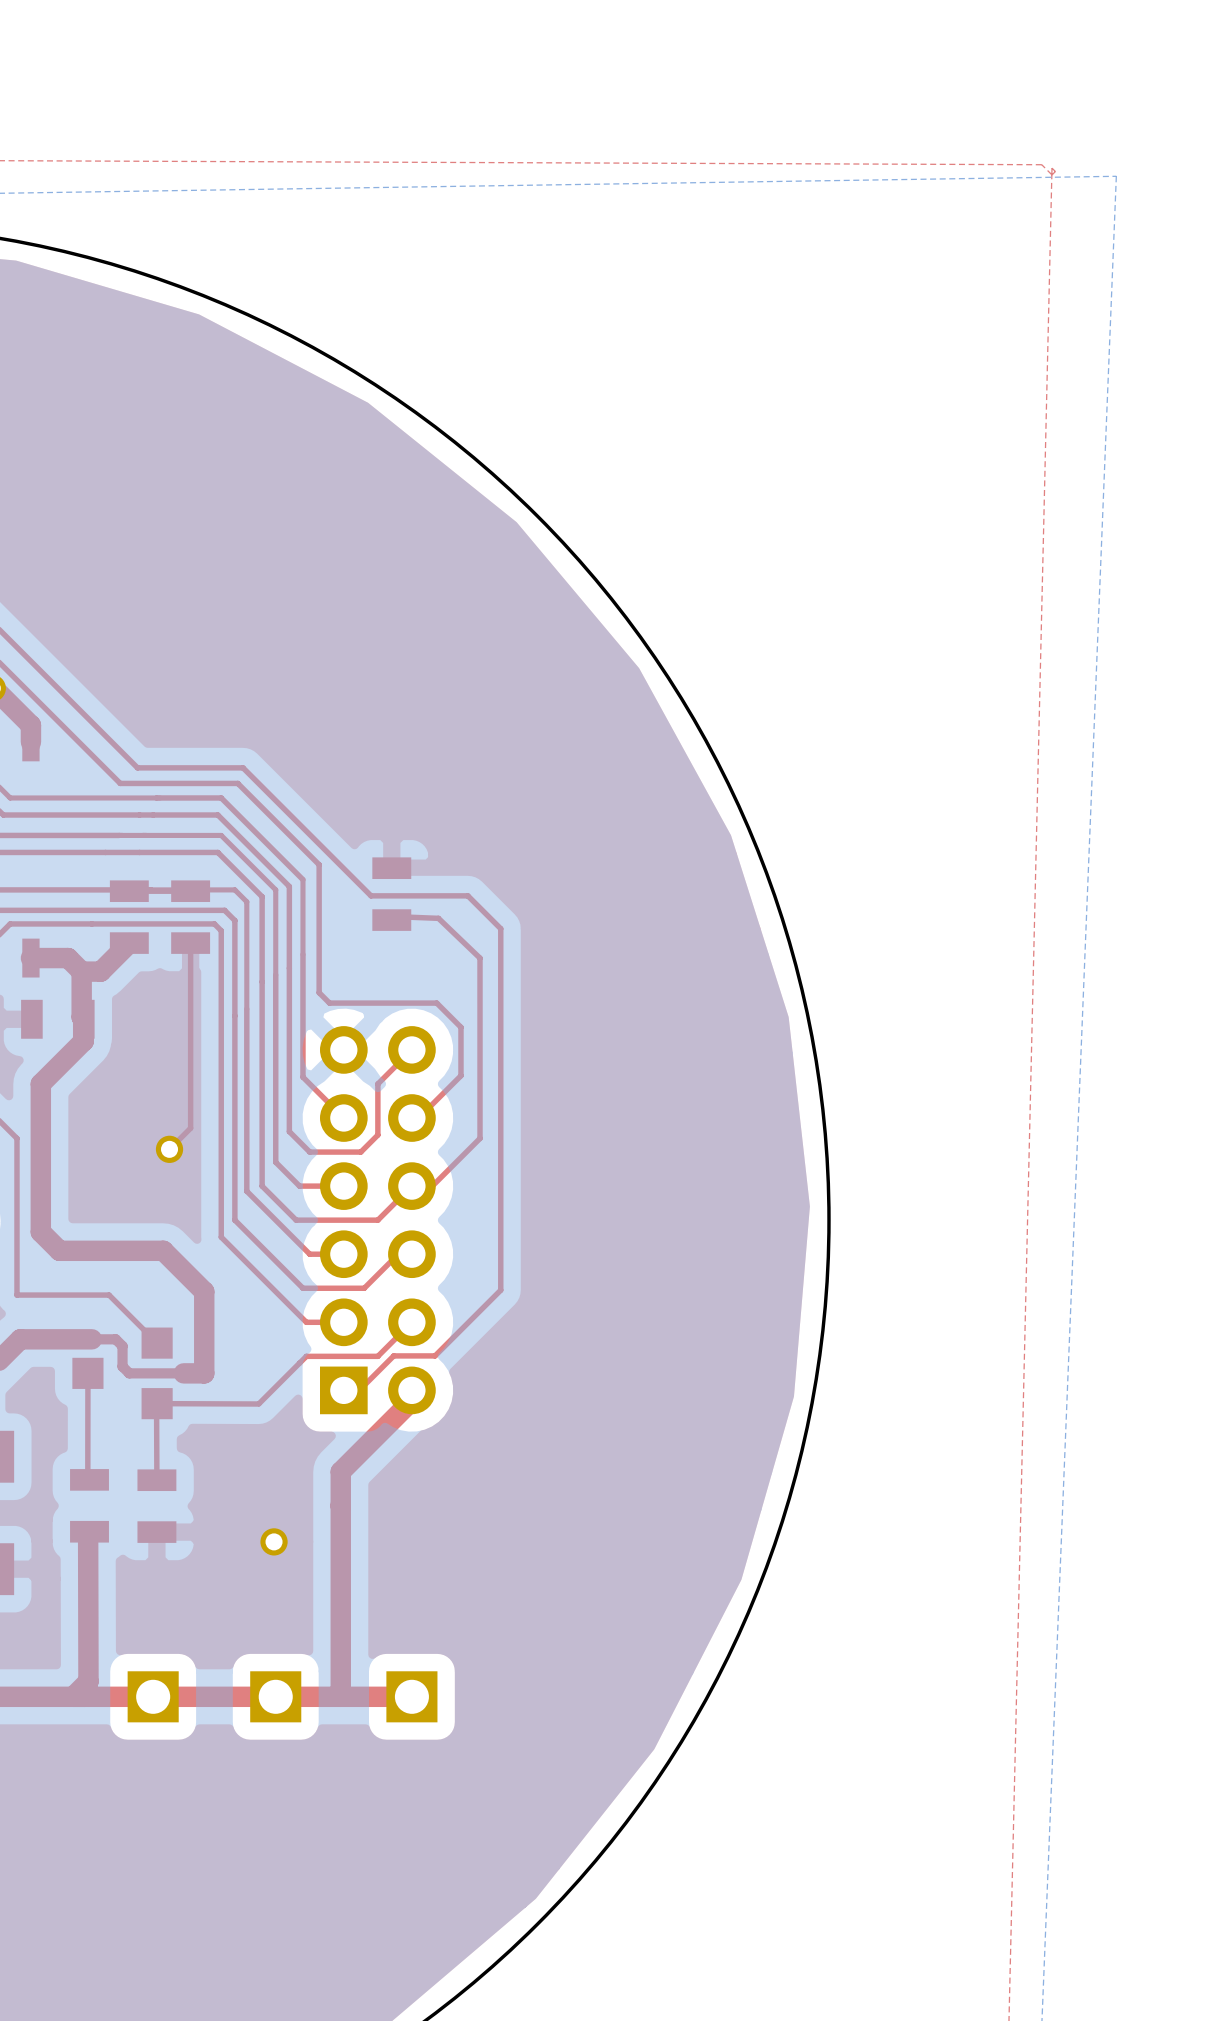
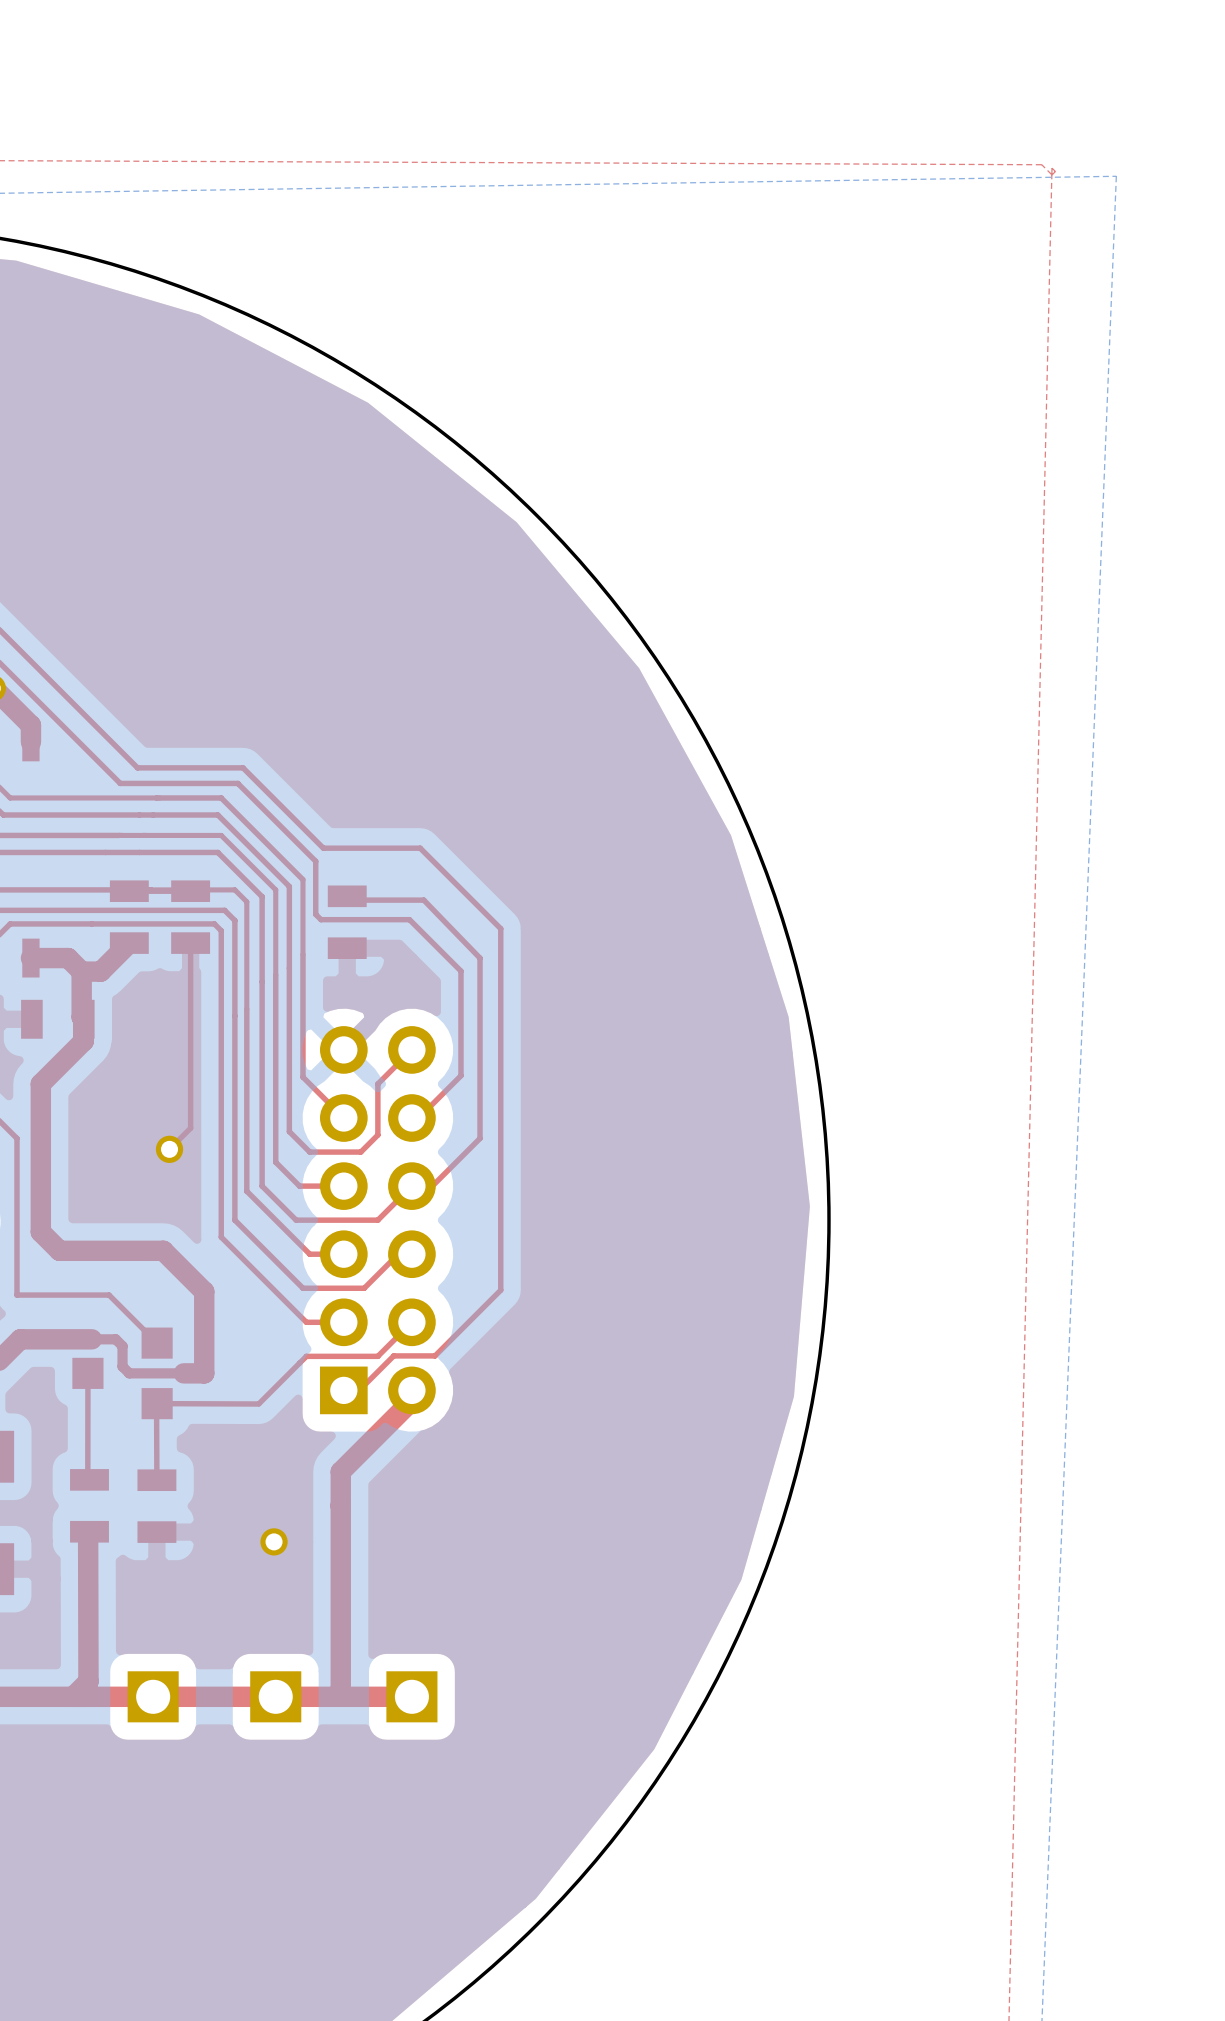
top track: (323, 848) (371, 895) (467, 895) -> (323, 848) (420, 848) (467, 895)
top track: (315, 861) (319, 864) (319, 992) (329, 1003) (436, 1003) (460, 1027) -> (315, 861) (315, 914) (321, 919) (409, 919) (460, 971) (460, 1027)
part position: (391, 894) -> (347, 922)
top track: (390, 914) (391, 916) (438, 918) (480, 958) -> (357, 900) (423, 900) (480, 958)

